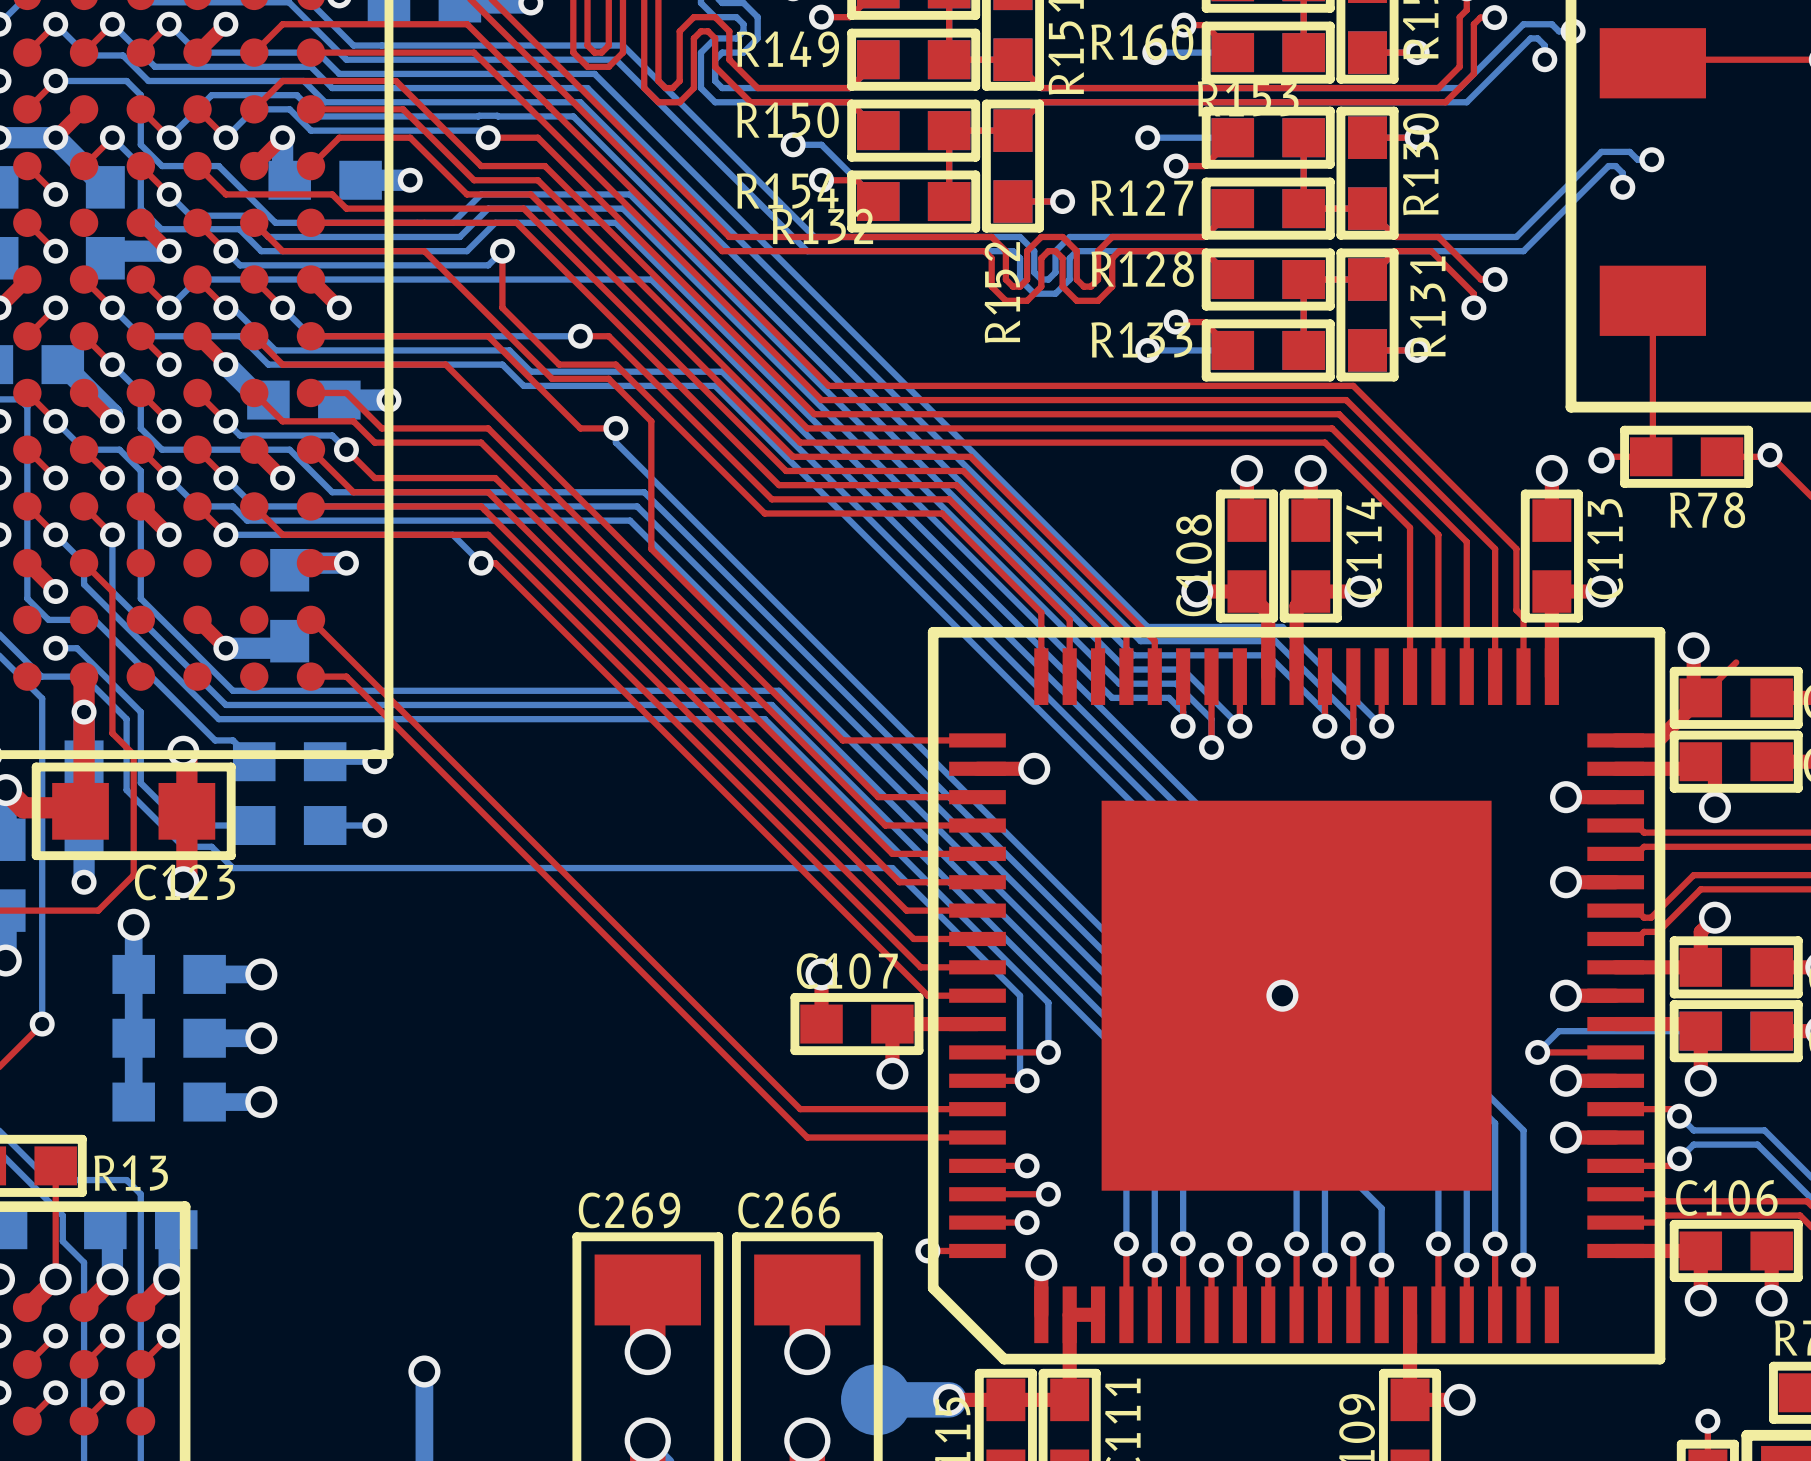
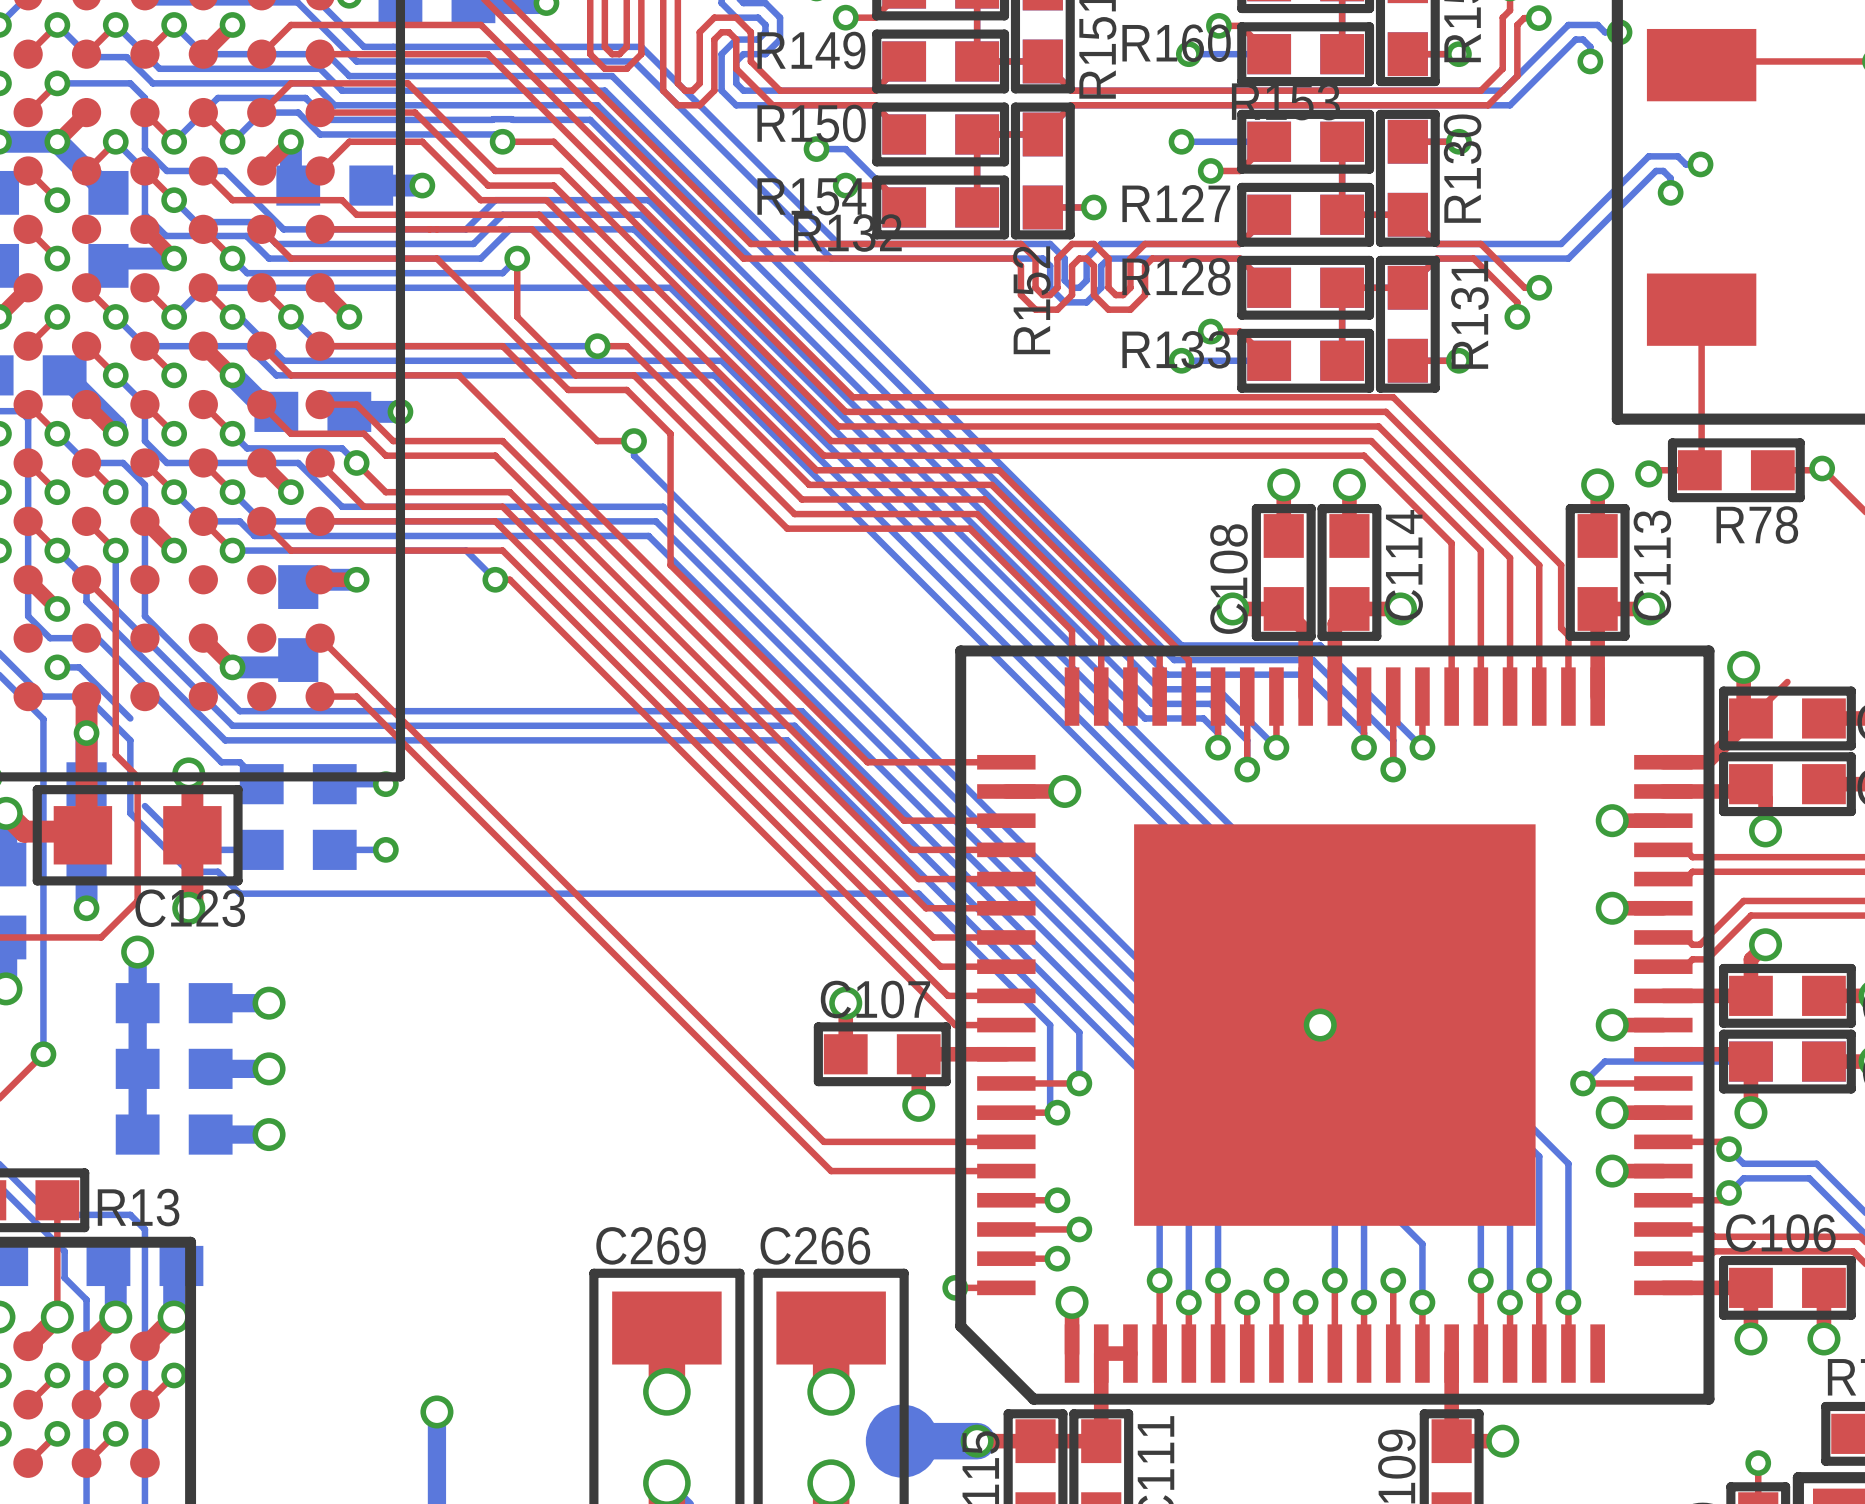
bottom track: (509, 350) (530, 371) (722, 371) -> (524, 360) (721, 360) (743, 382)
bottom track: (502, 364) (523, 385) (715, 385) -> (517, 375) (714, 375) (736, 397)
bottom track: (126, 697) (140, 712) (140, 782) -> none

